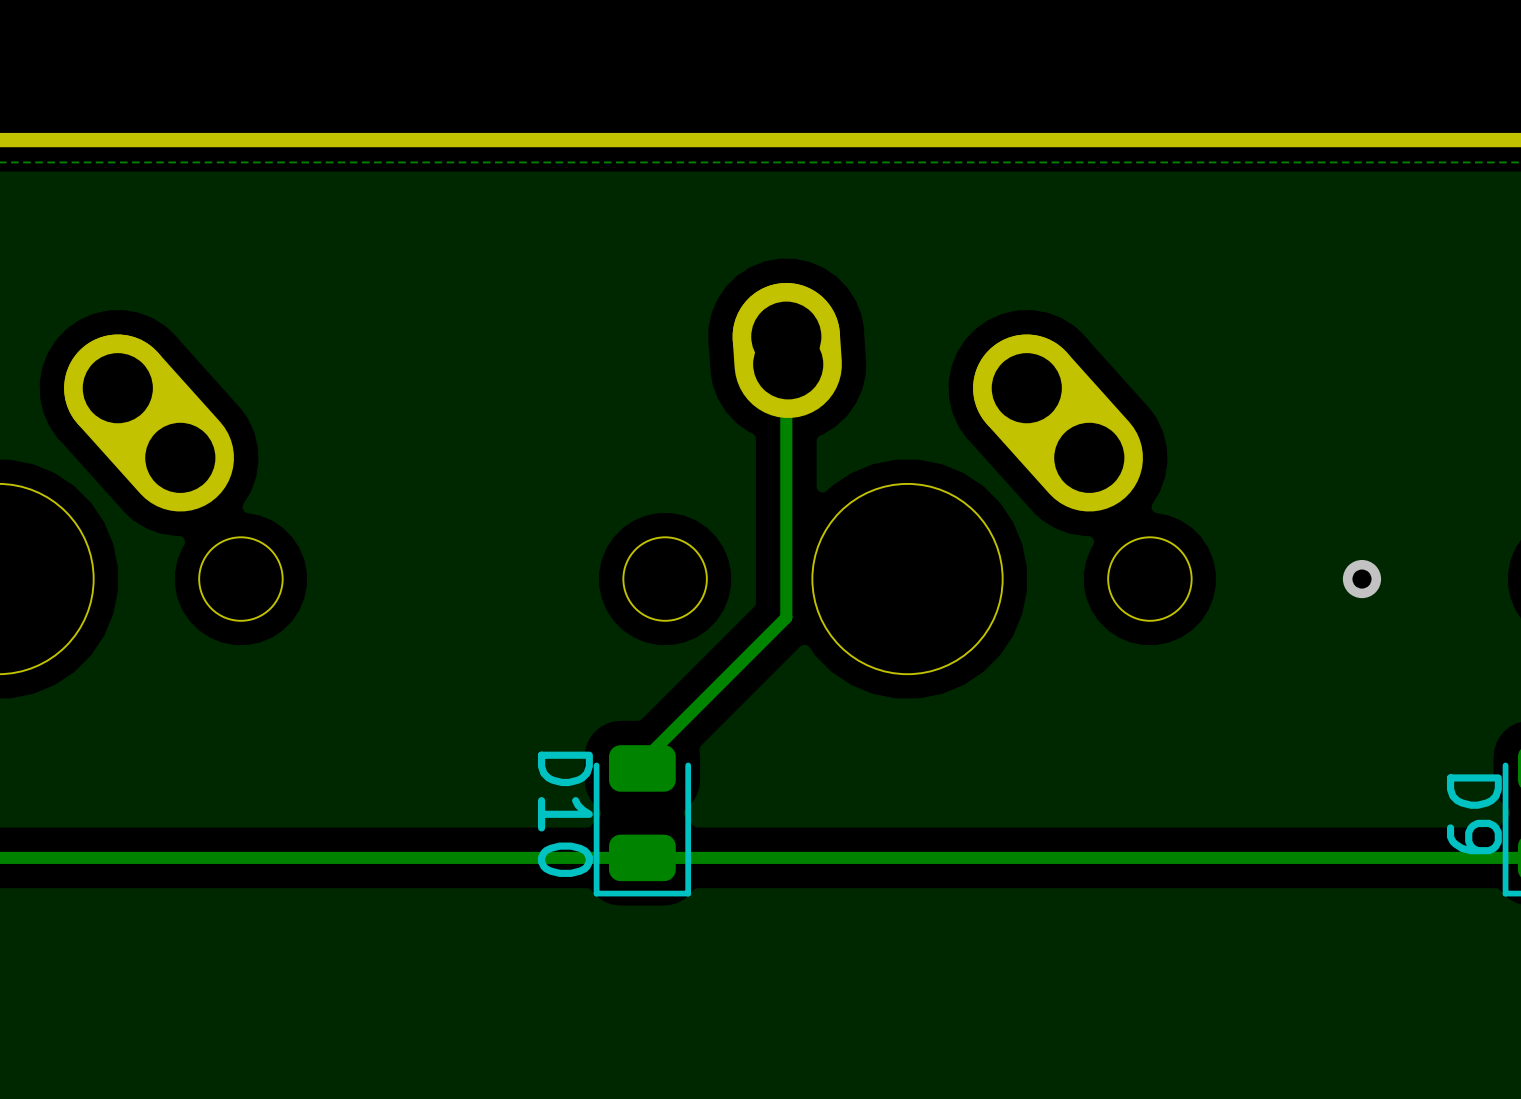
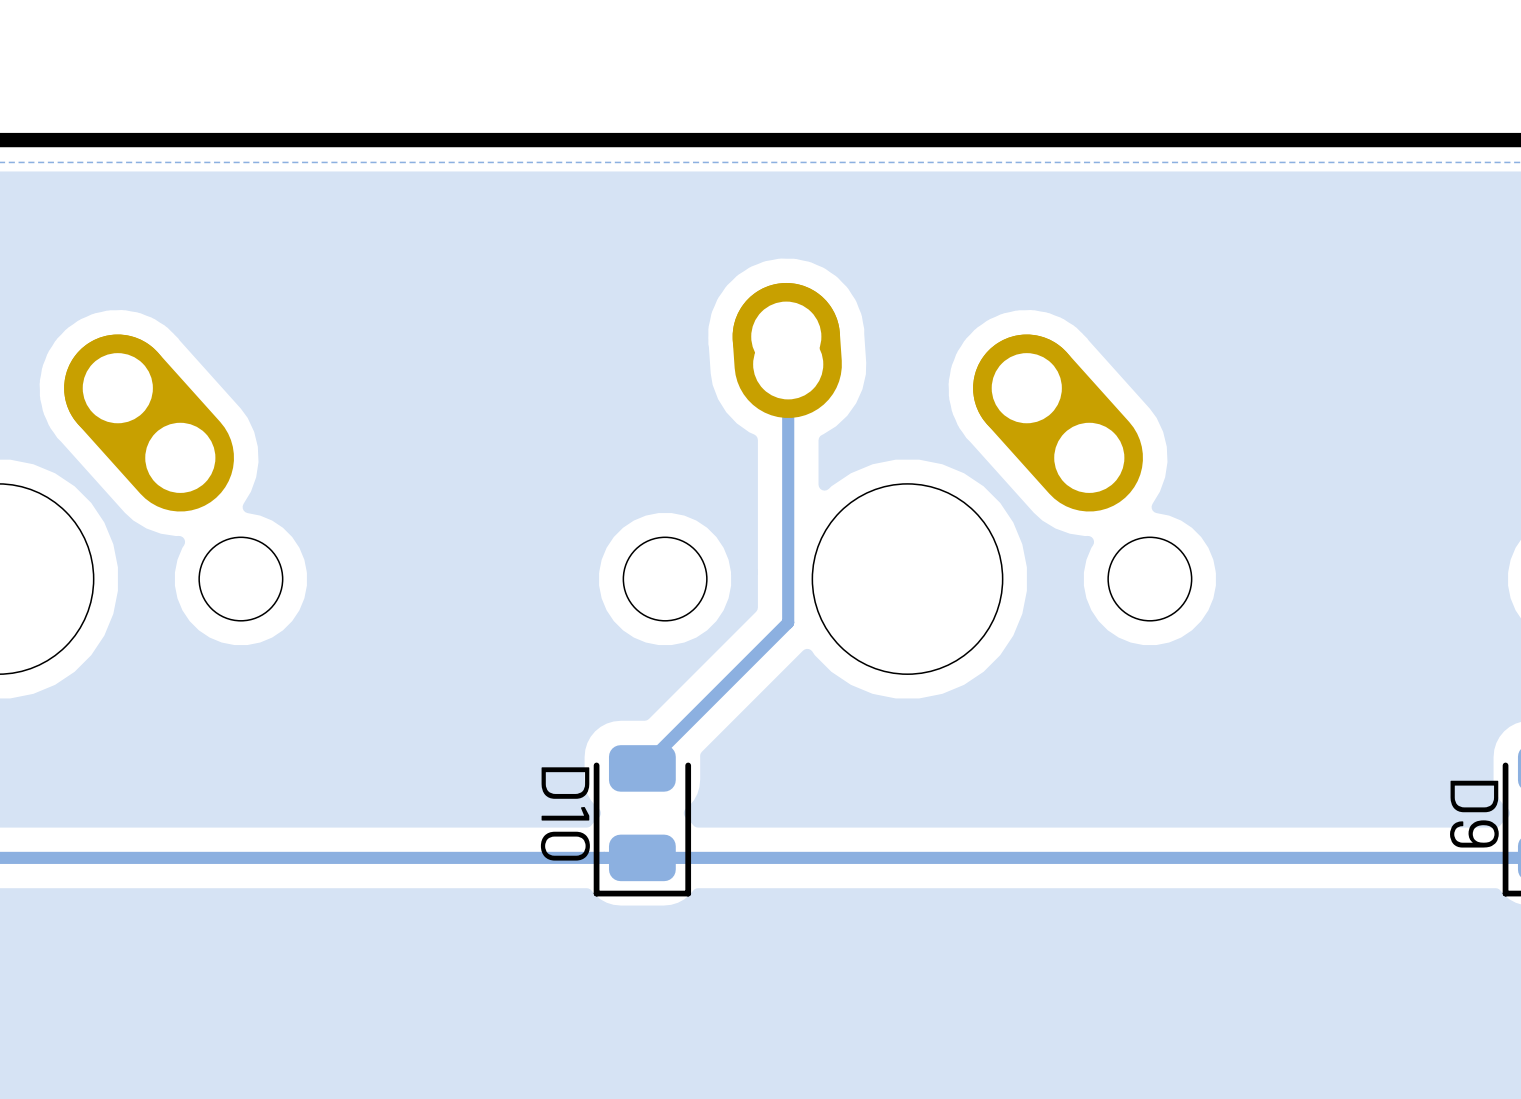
track: (786, 336) (786, 617) (642, 761) -> none
track: none -> (788, 364) (788, 622) (642, 768)
via: (1361, 579) -> none

